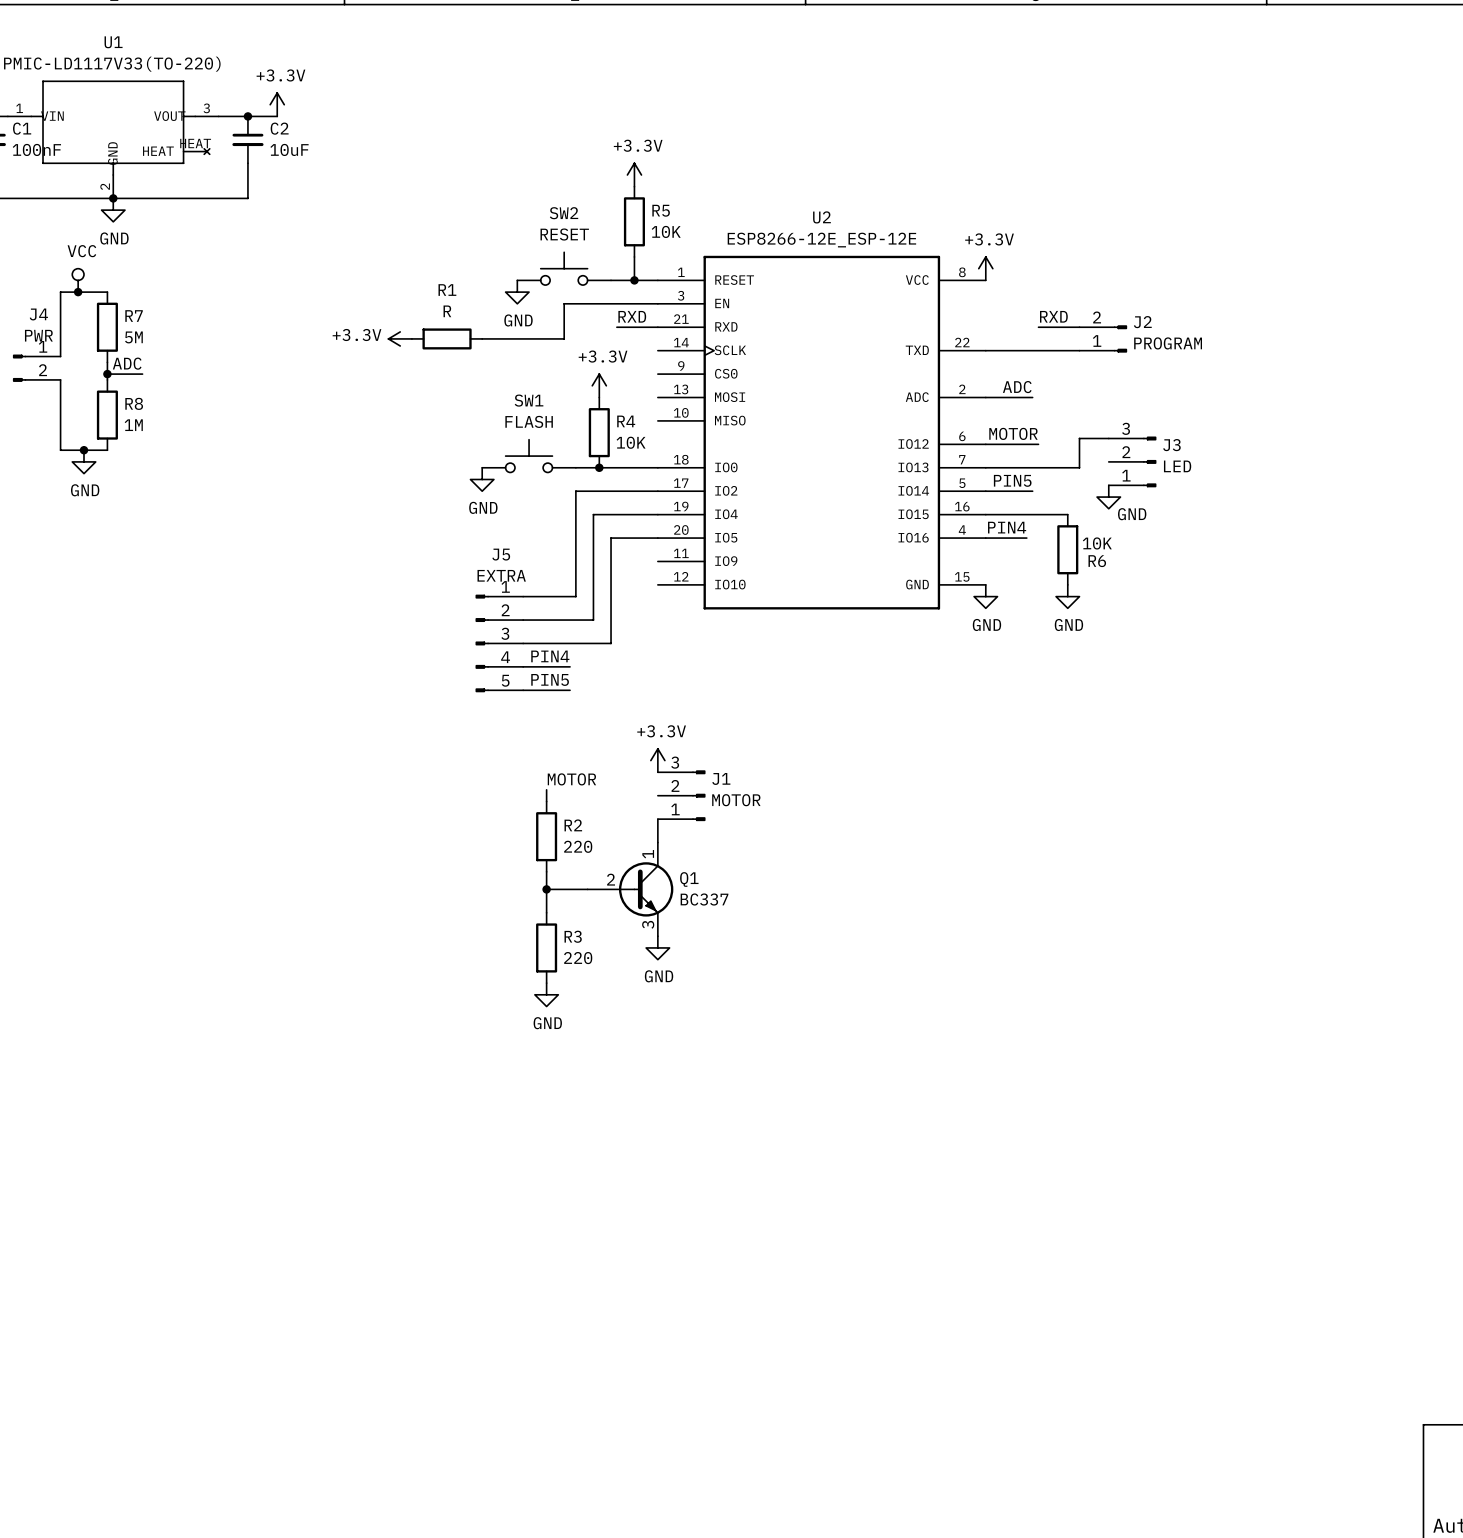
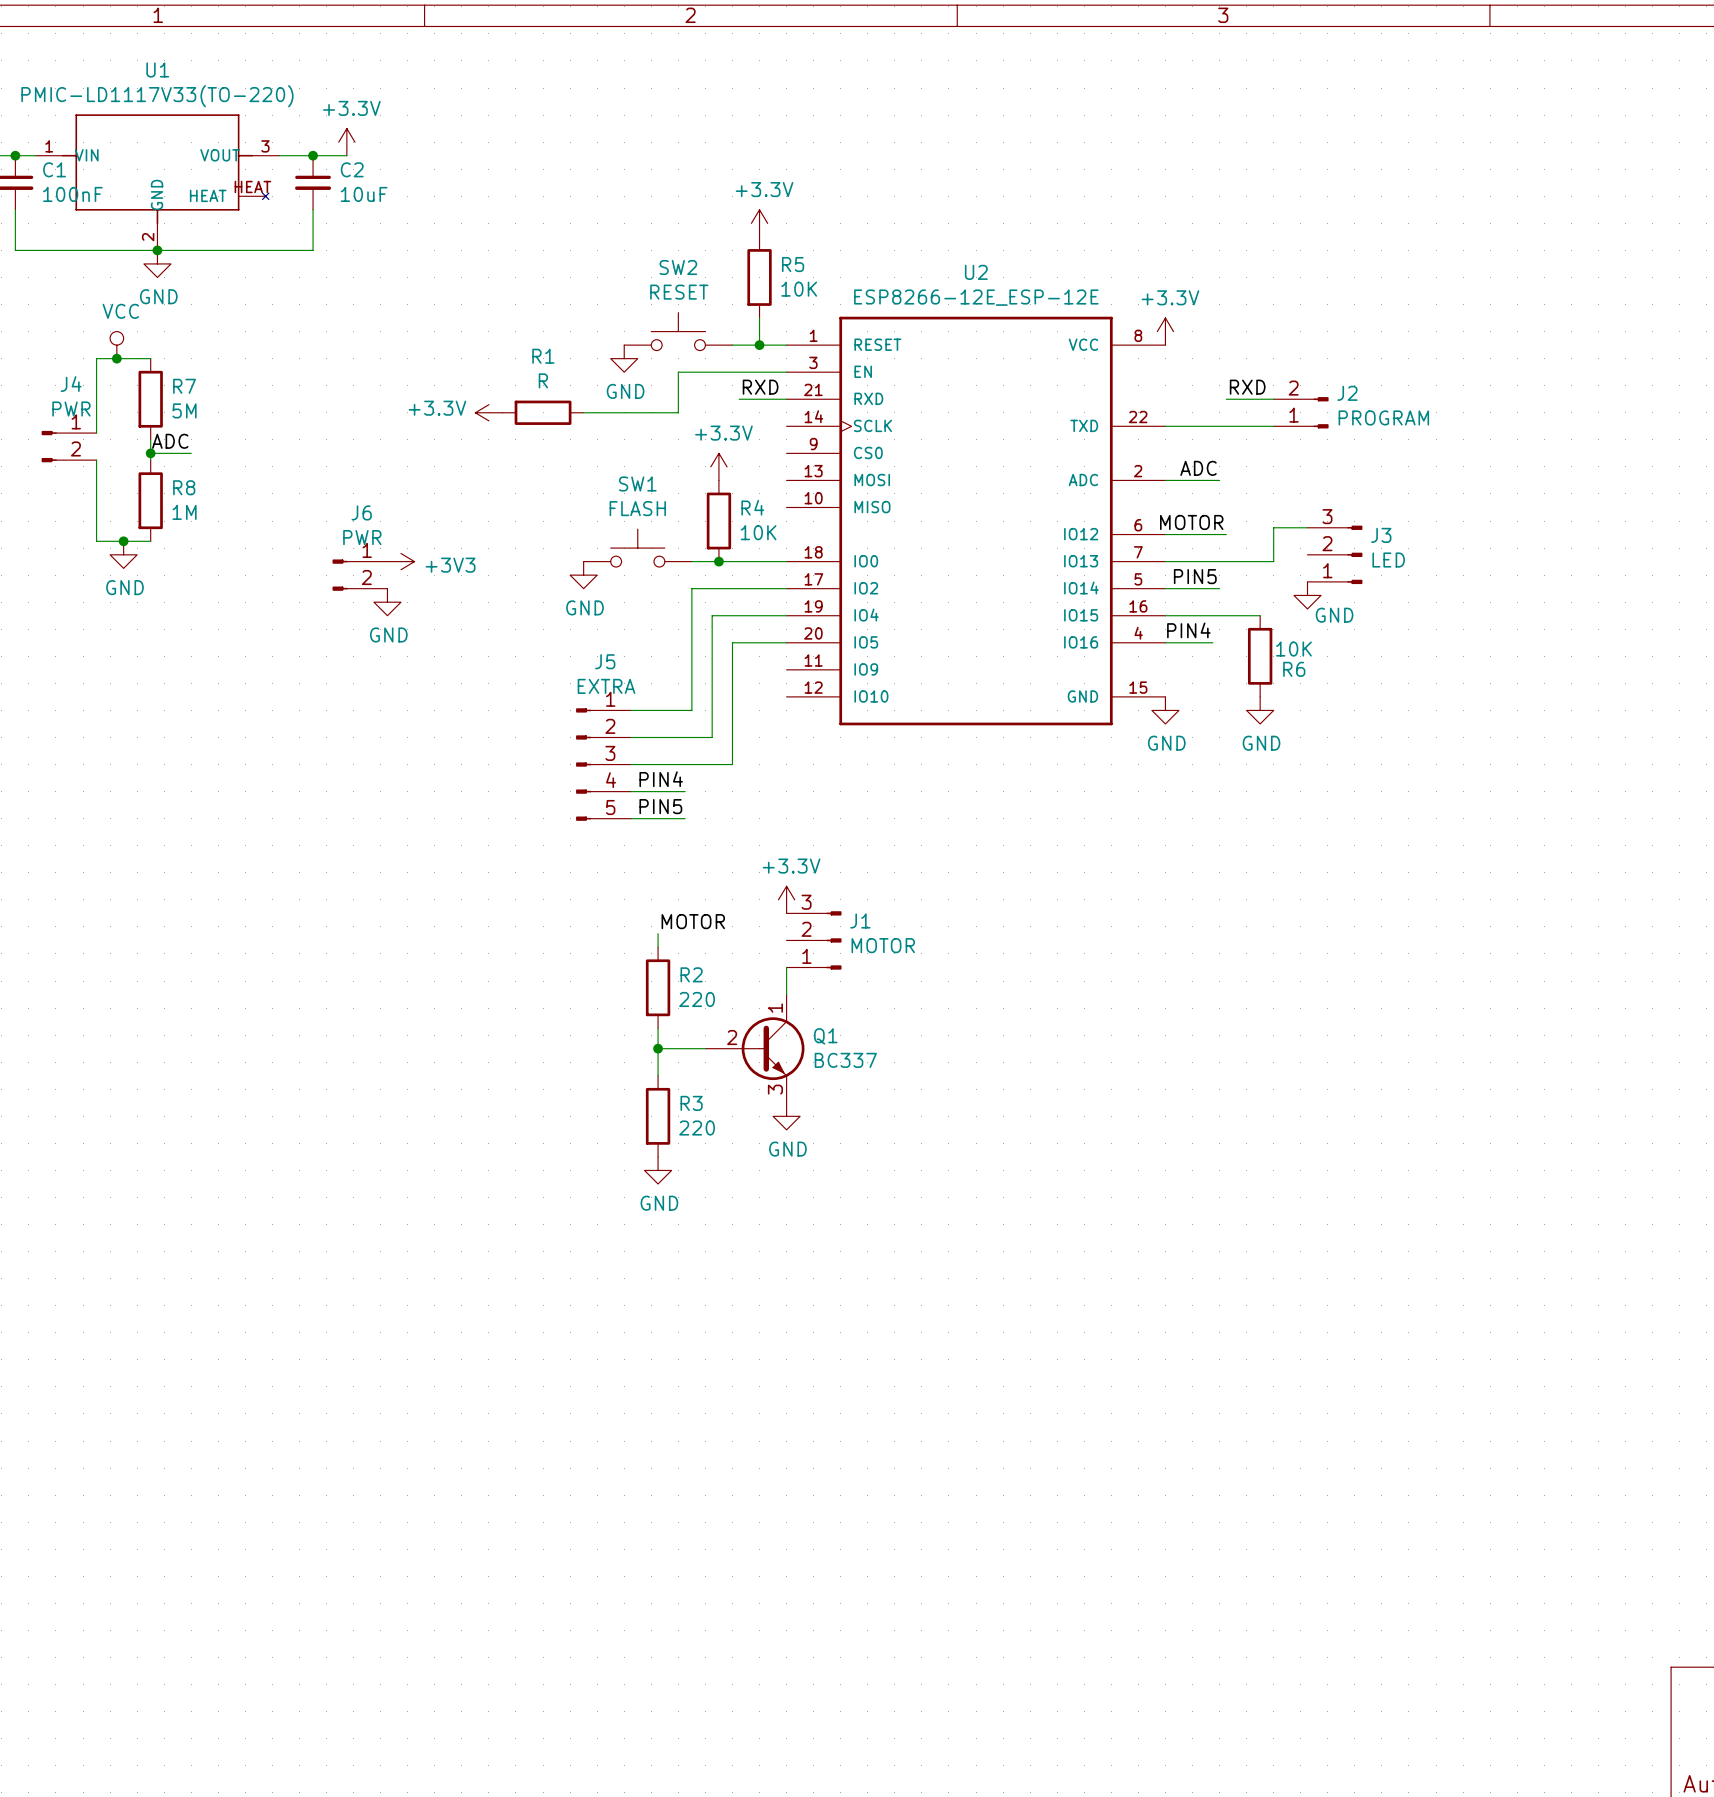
power symbol: none -> +3V3 (400, 561)
J6: none -> PWR (359, 575)
power symbol: none -> GND (387, 602)

